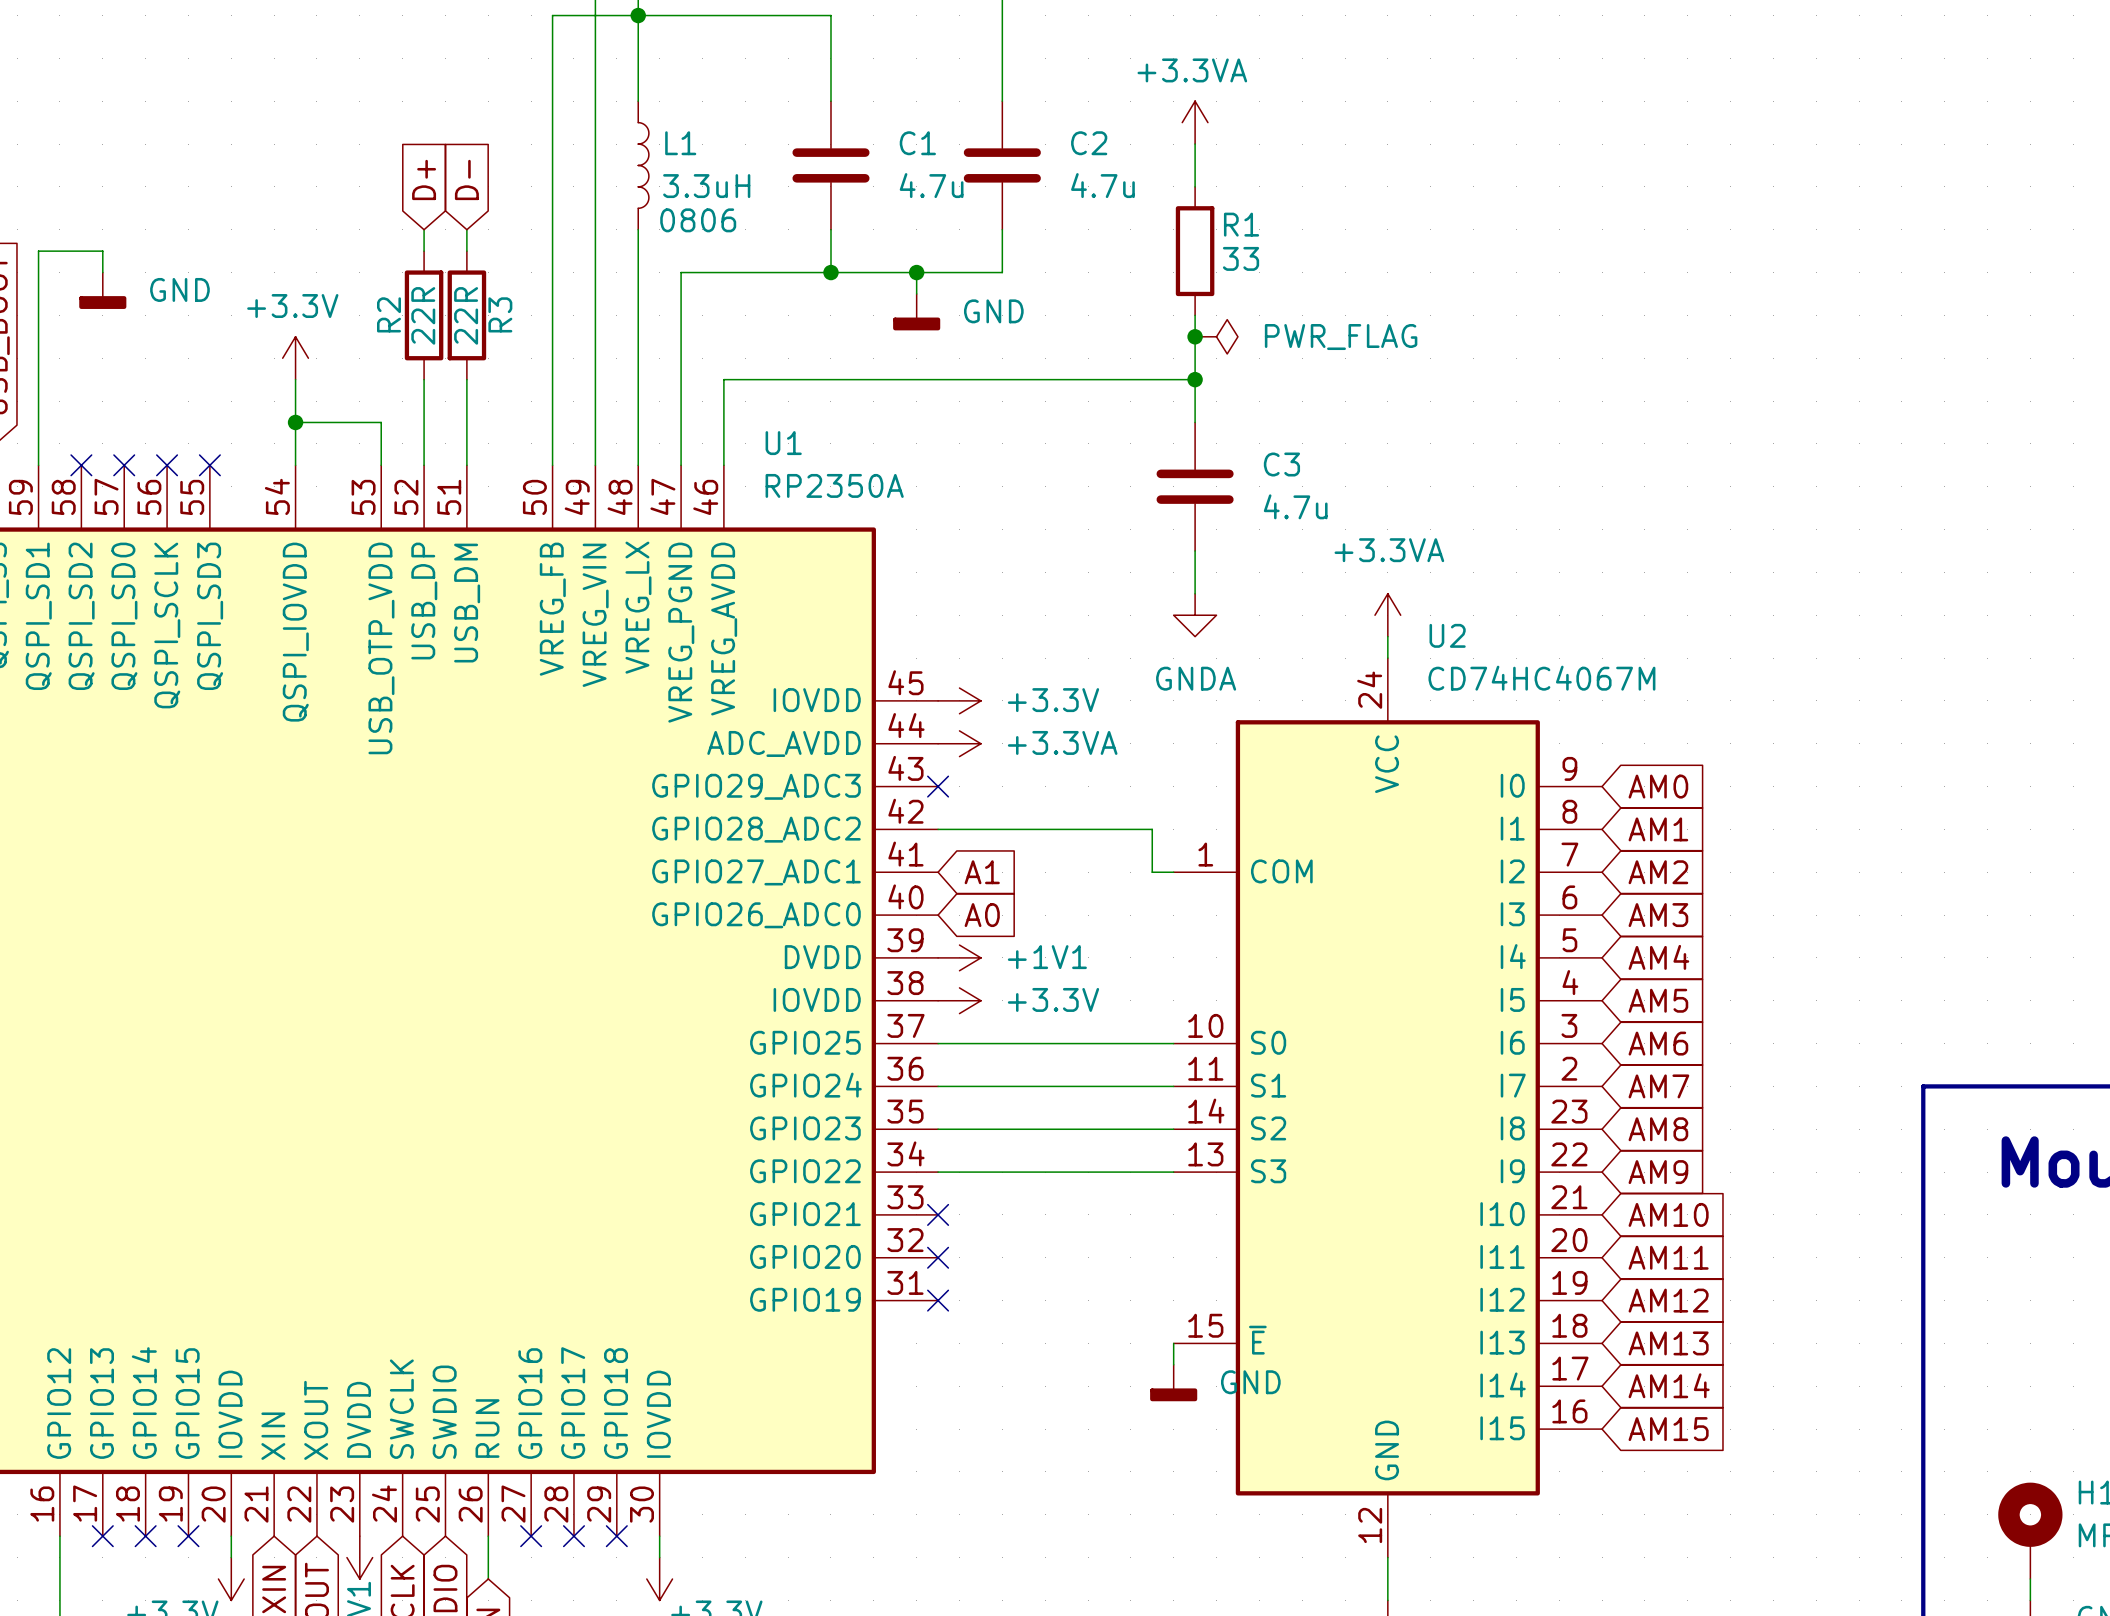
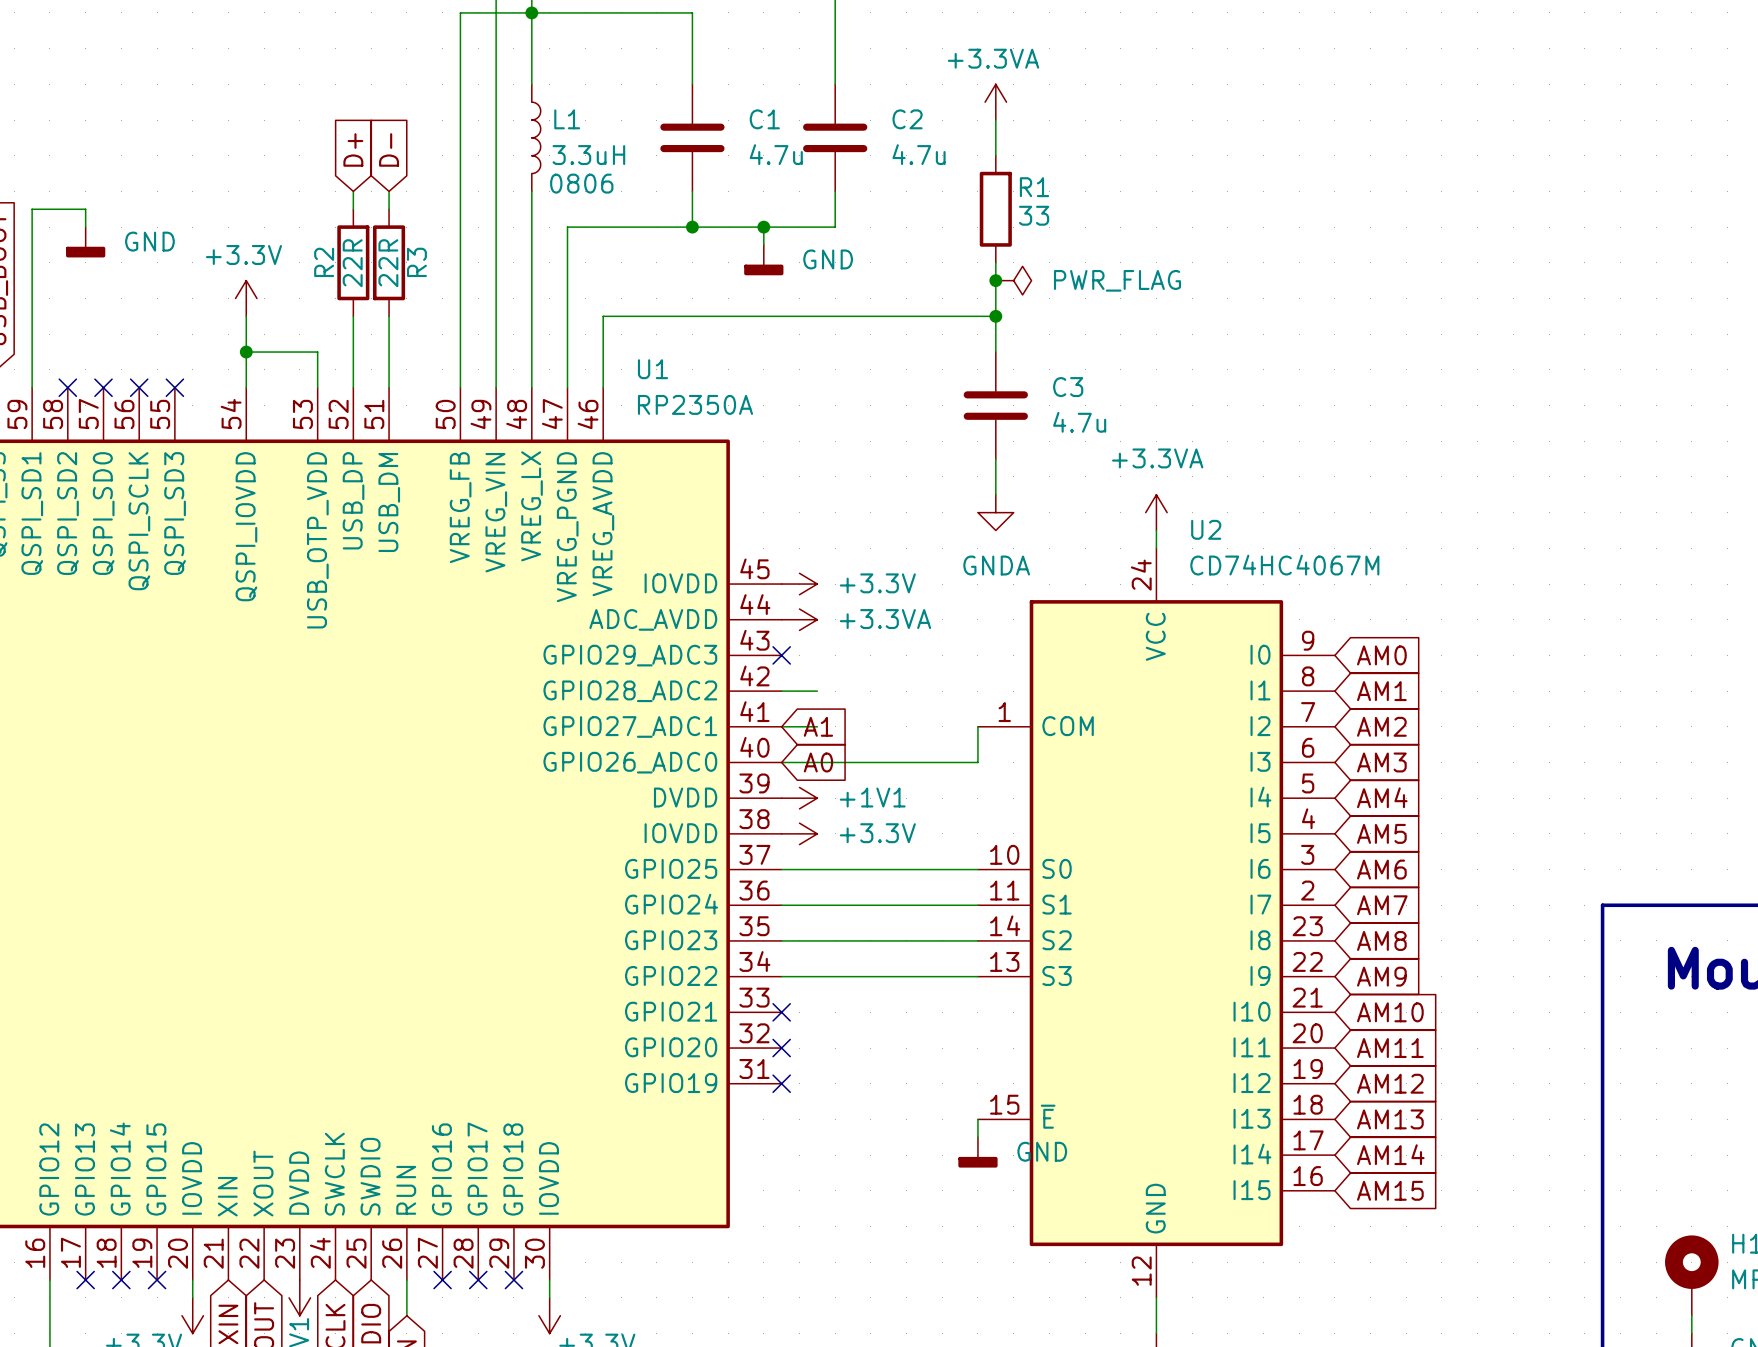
wire: (980, 829) (1152, 829) (1152, 872) (1173, 872) -> (781, 762) (977, 762) (977, 726)
wire: none -> (781, 726) (817, 726)

